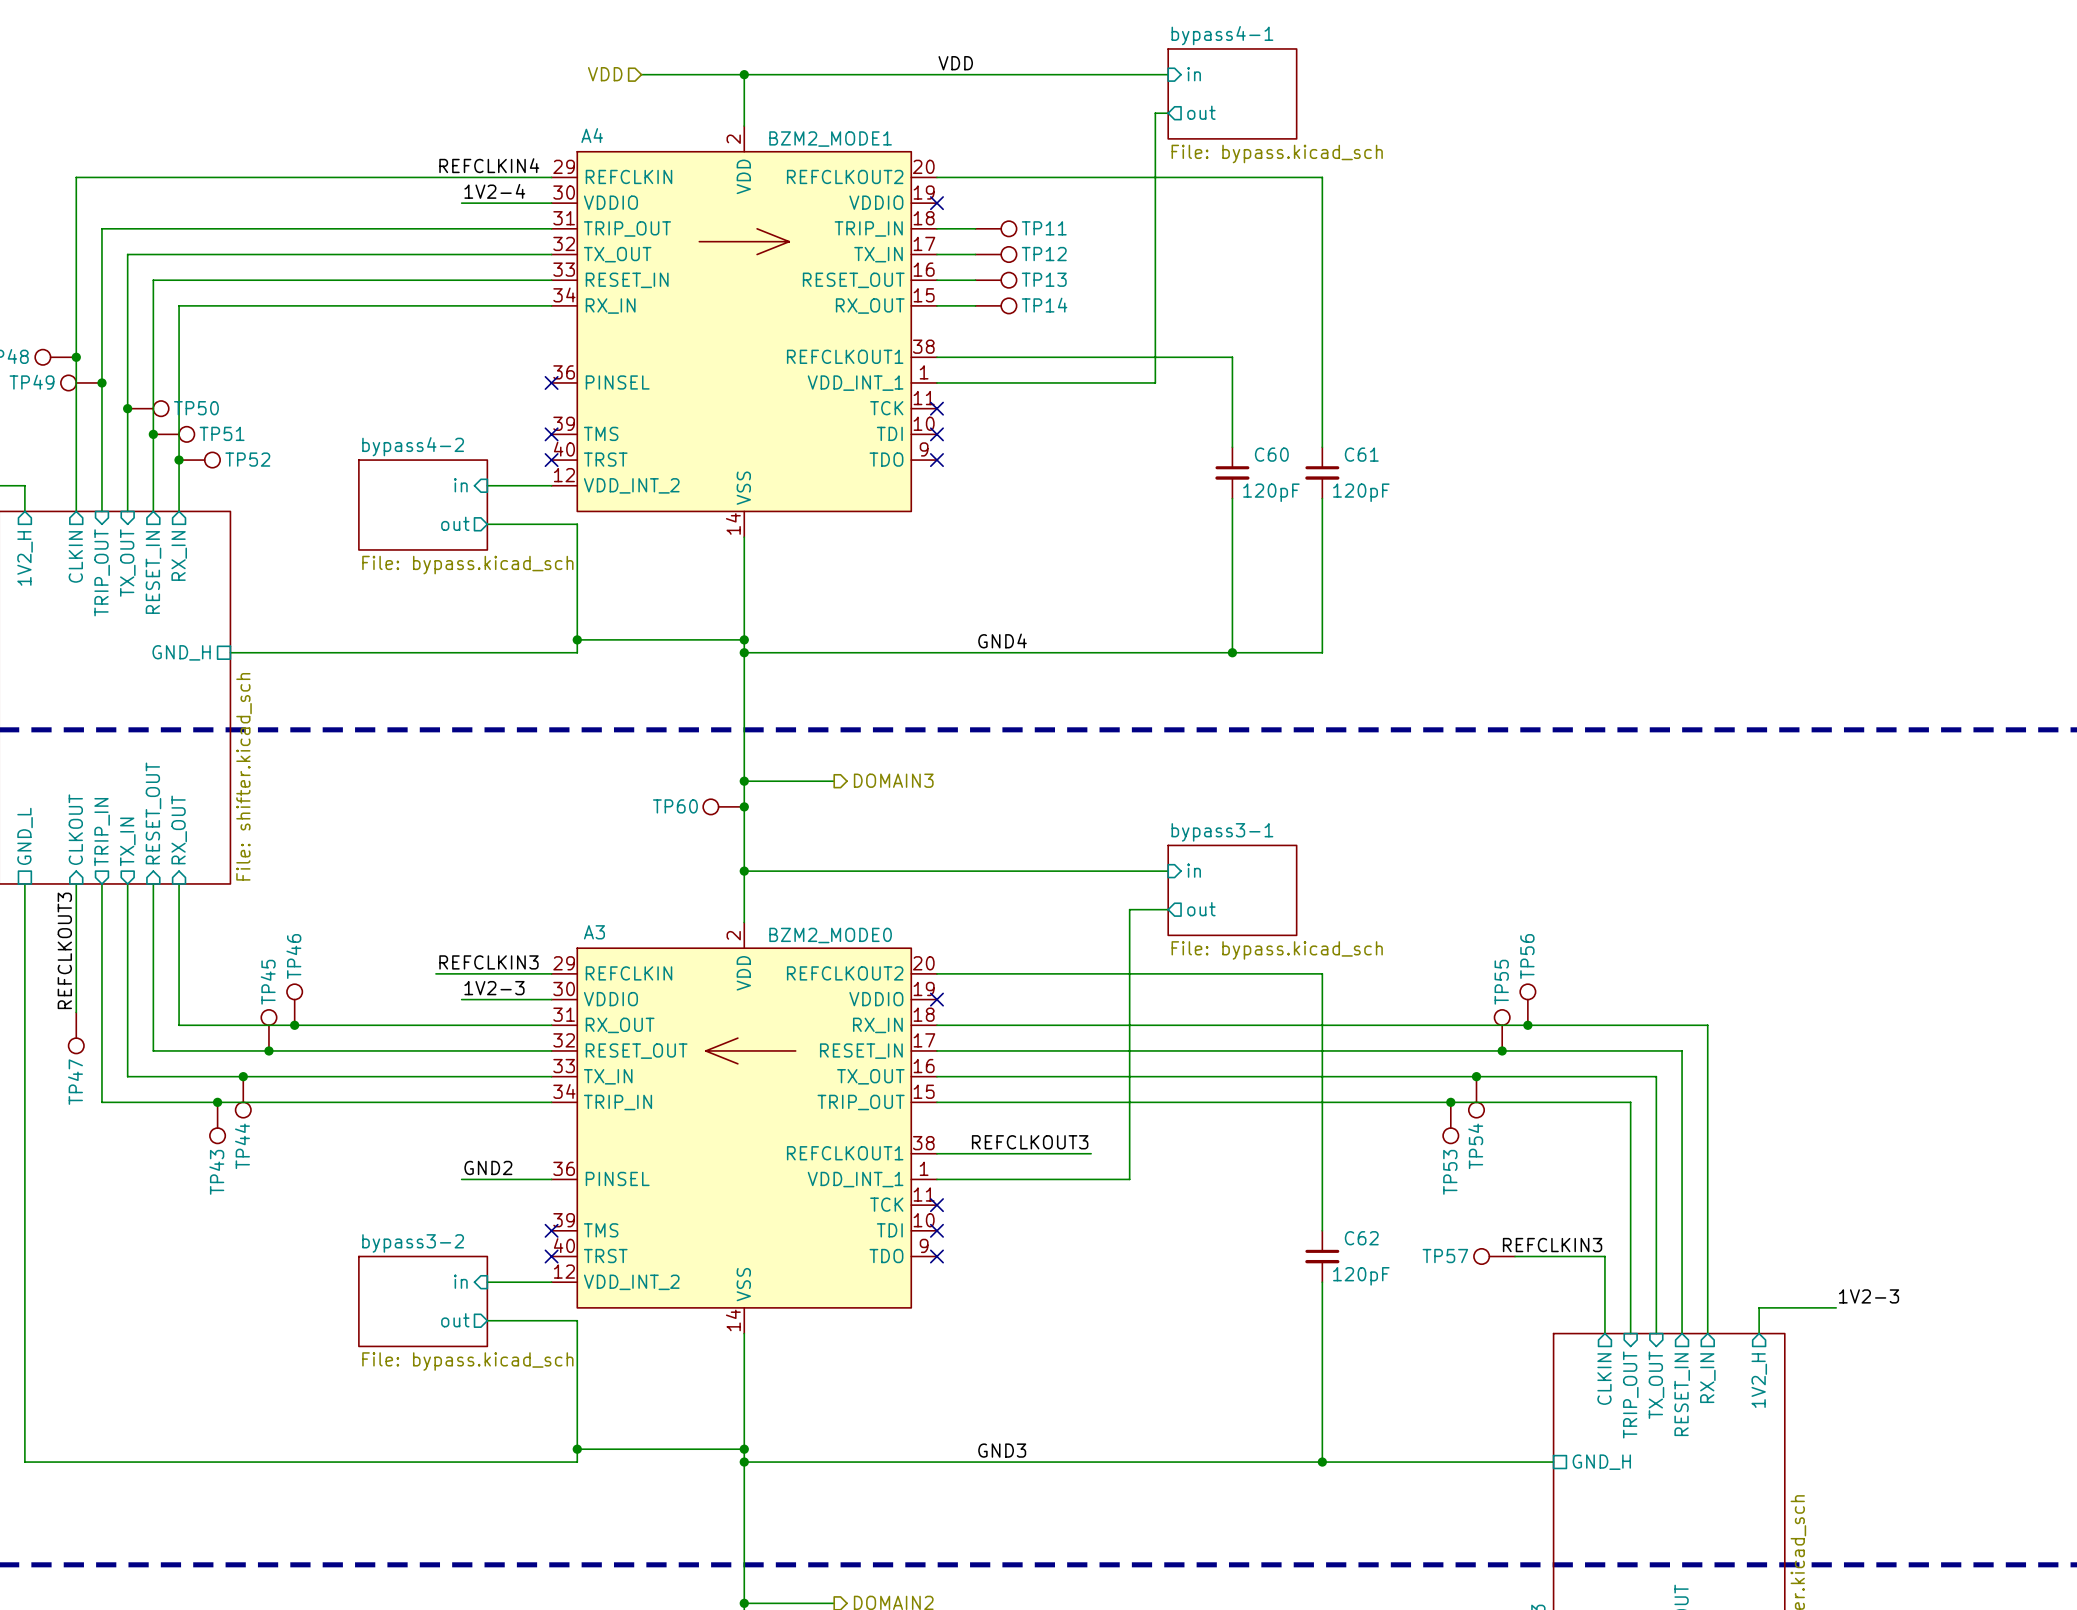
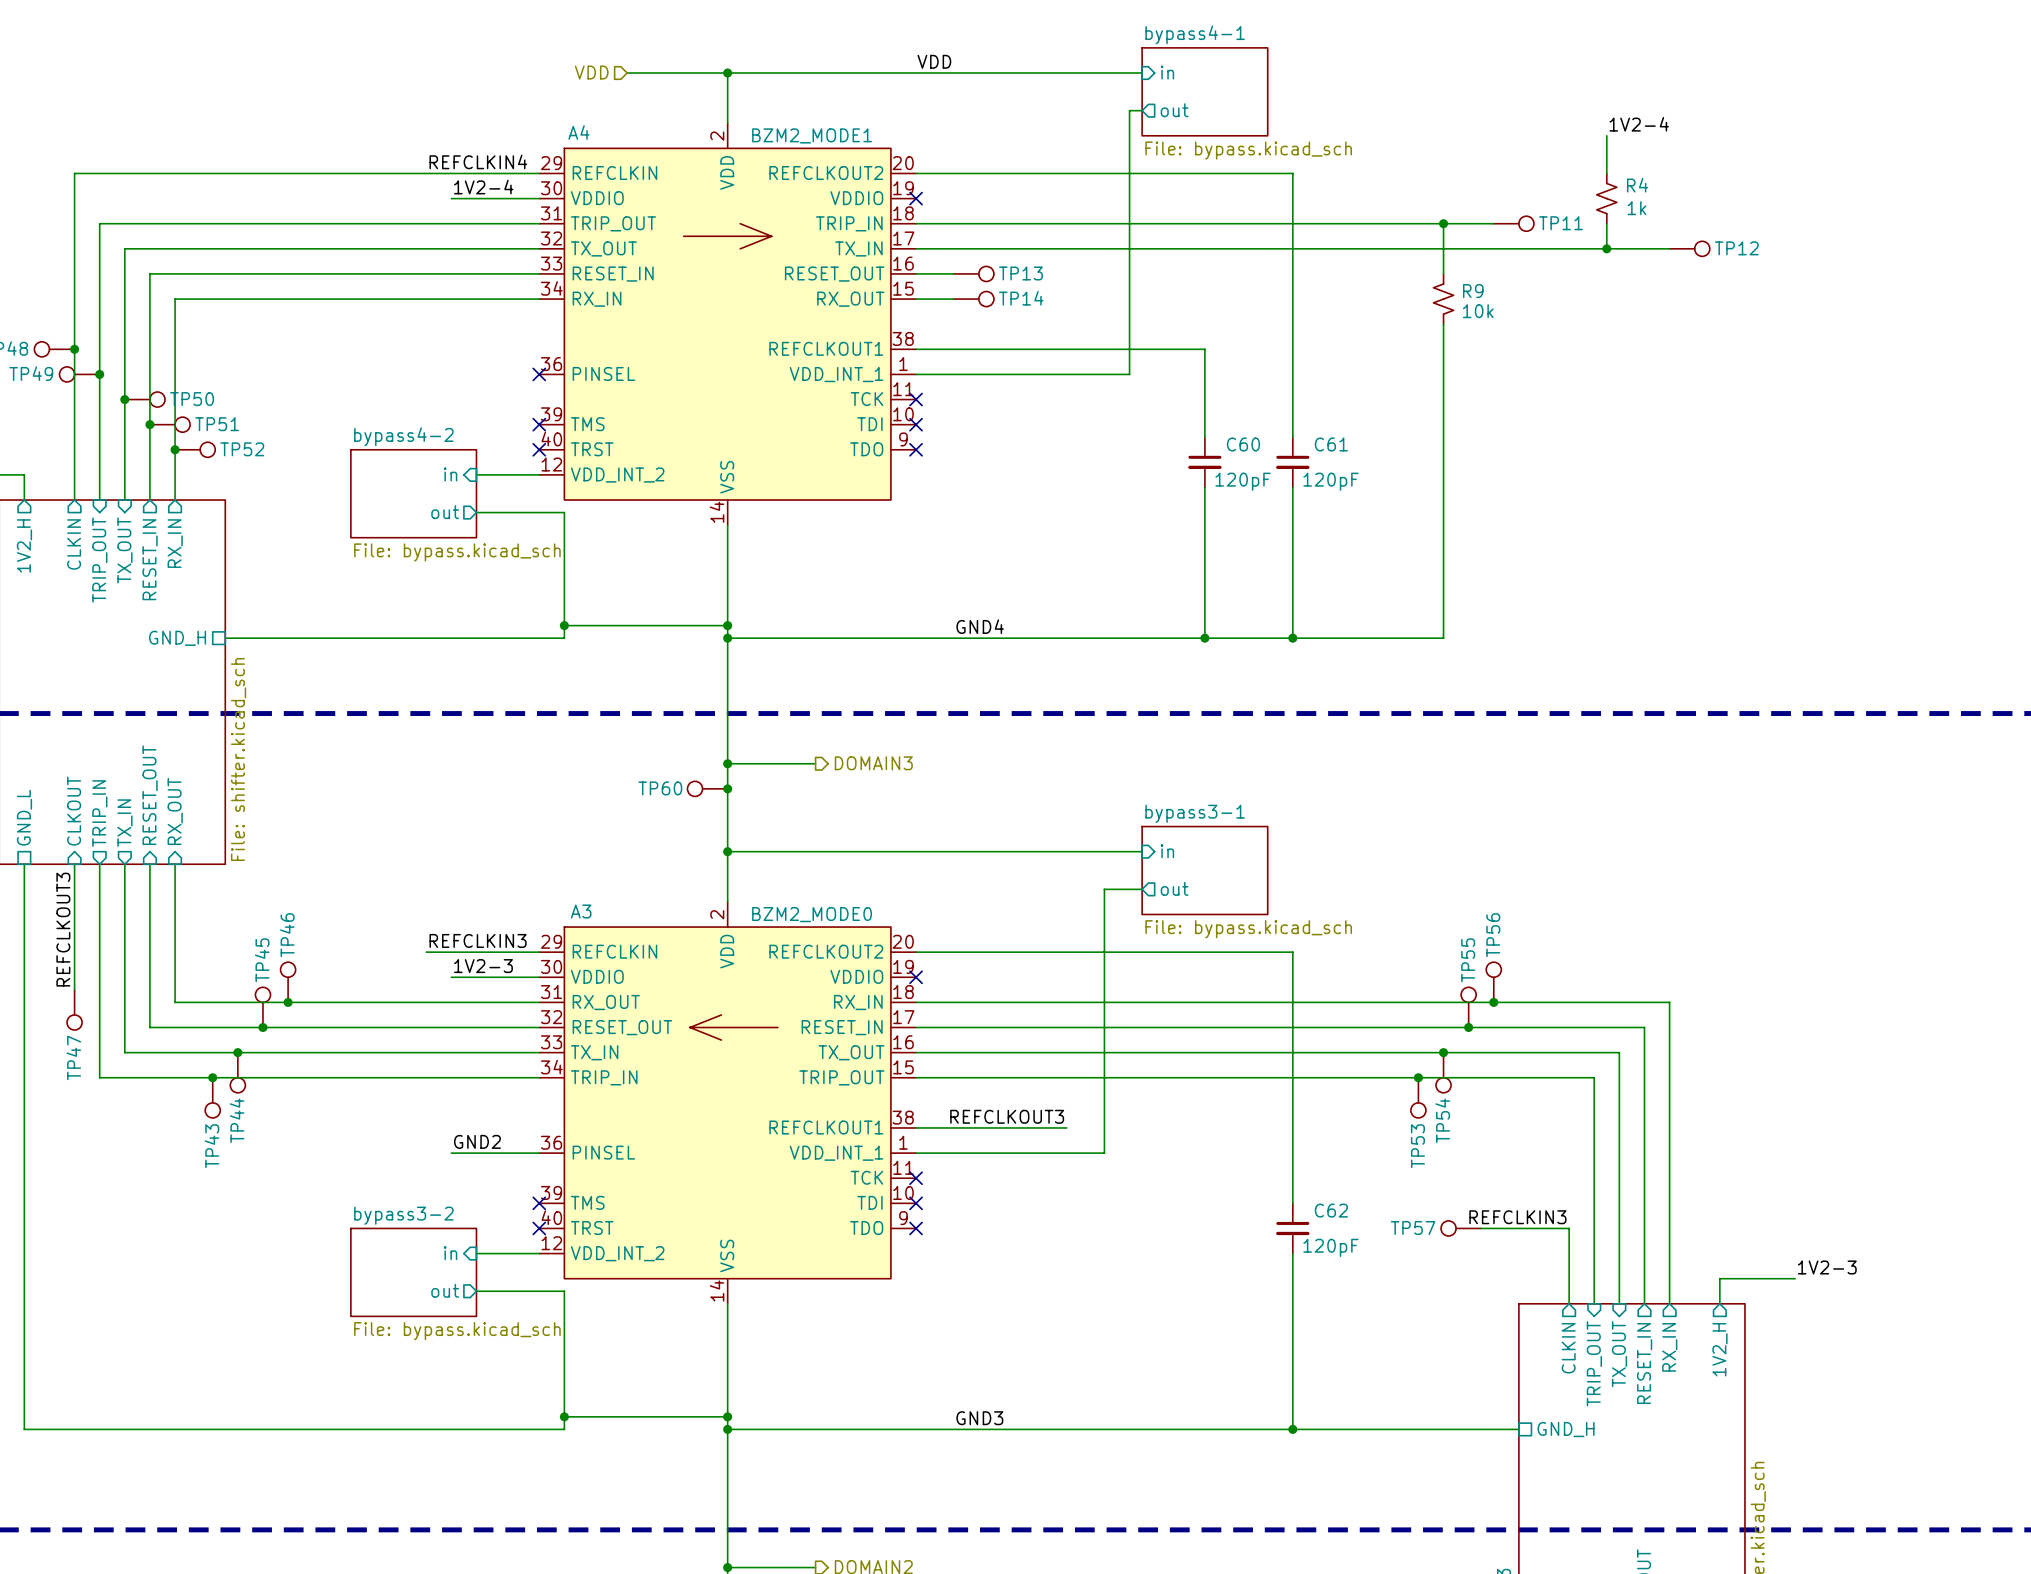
label: none -> 1V2-4 (1639, 124)
wire: none -> (1606, 135) (1606, 173)
R4: none -> 1k (1606, 198)
wire: none -> (953, 223) (1493, 223)
TP11 position: (996, 228) -> (1513, 223)
wire: none -> (1443, 223) (1443, 273)
junction: none -> (1443, 223)
wire: none -> (1606, 223) (1606, 248)
wire: none -> (953, 248) (1669, 248)
TP12 position: (996, 254) -> (1689, 248)
junction: none -> (1606, 248)
R9: none -> 10k (1443, 299)
wire: none -> (1443, 324) (1443, 638) (1292, 638)
junction: none -> (1292, 638)

